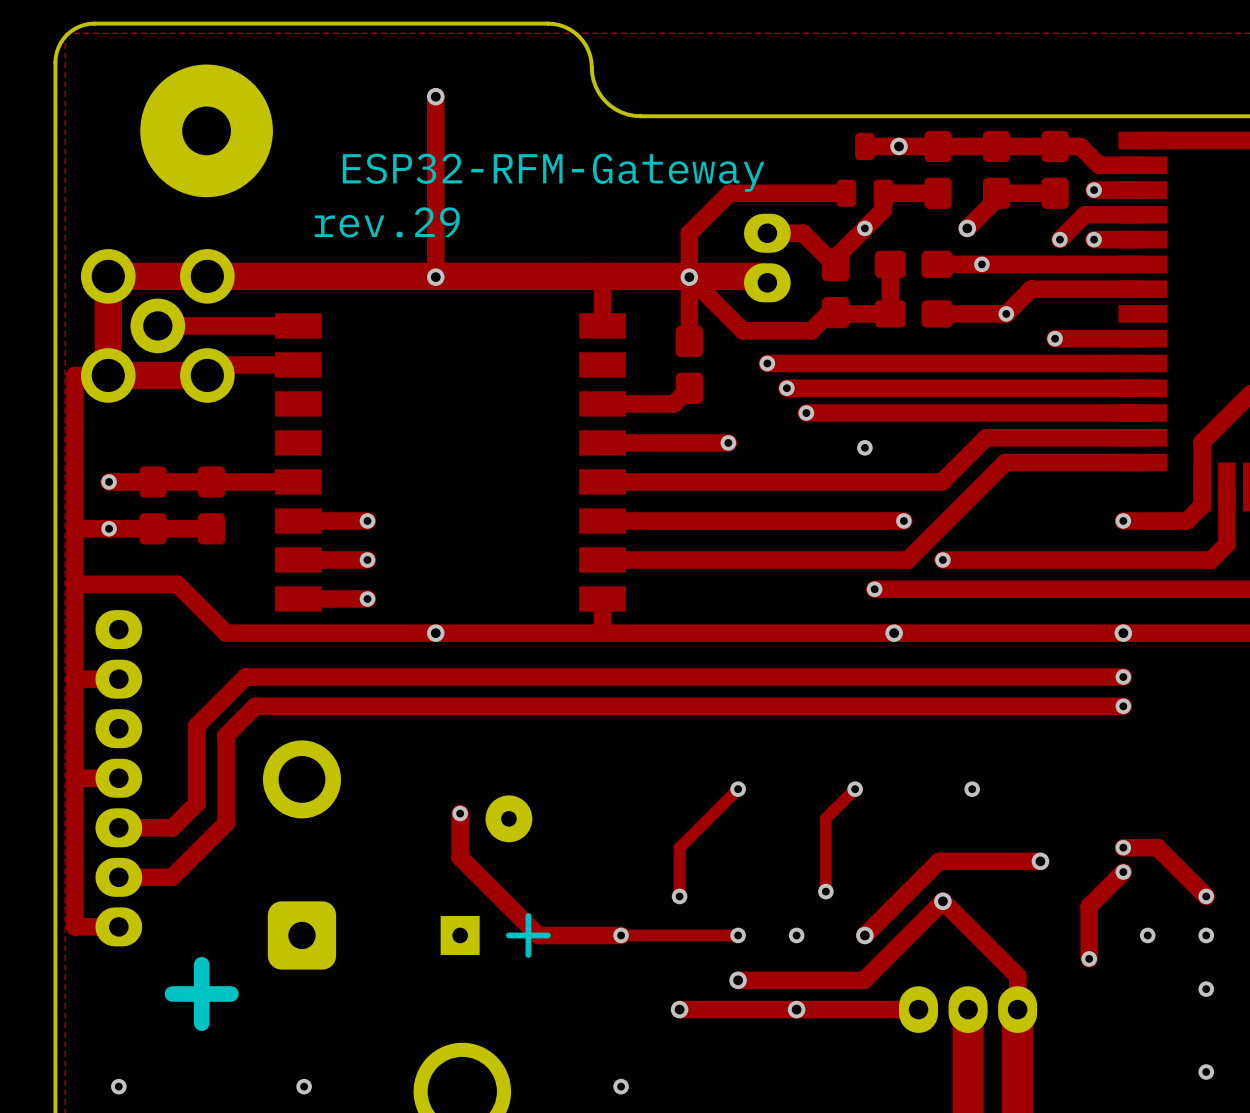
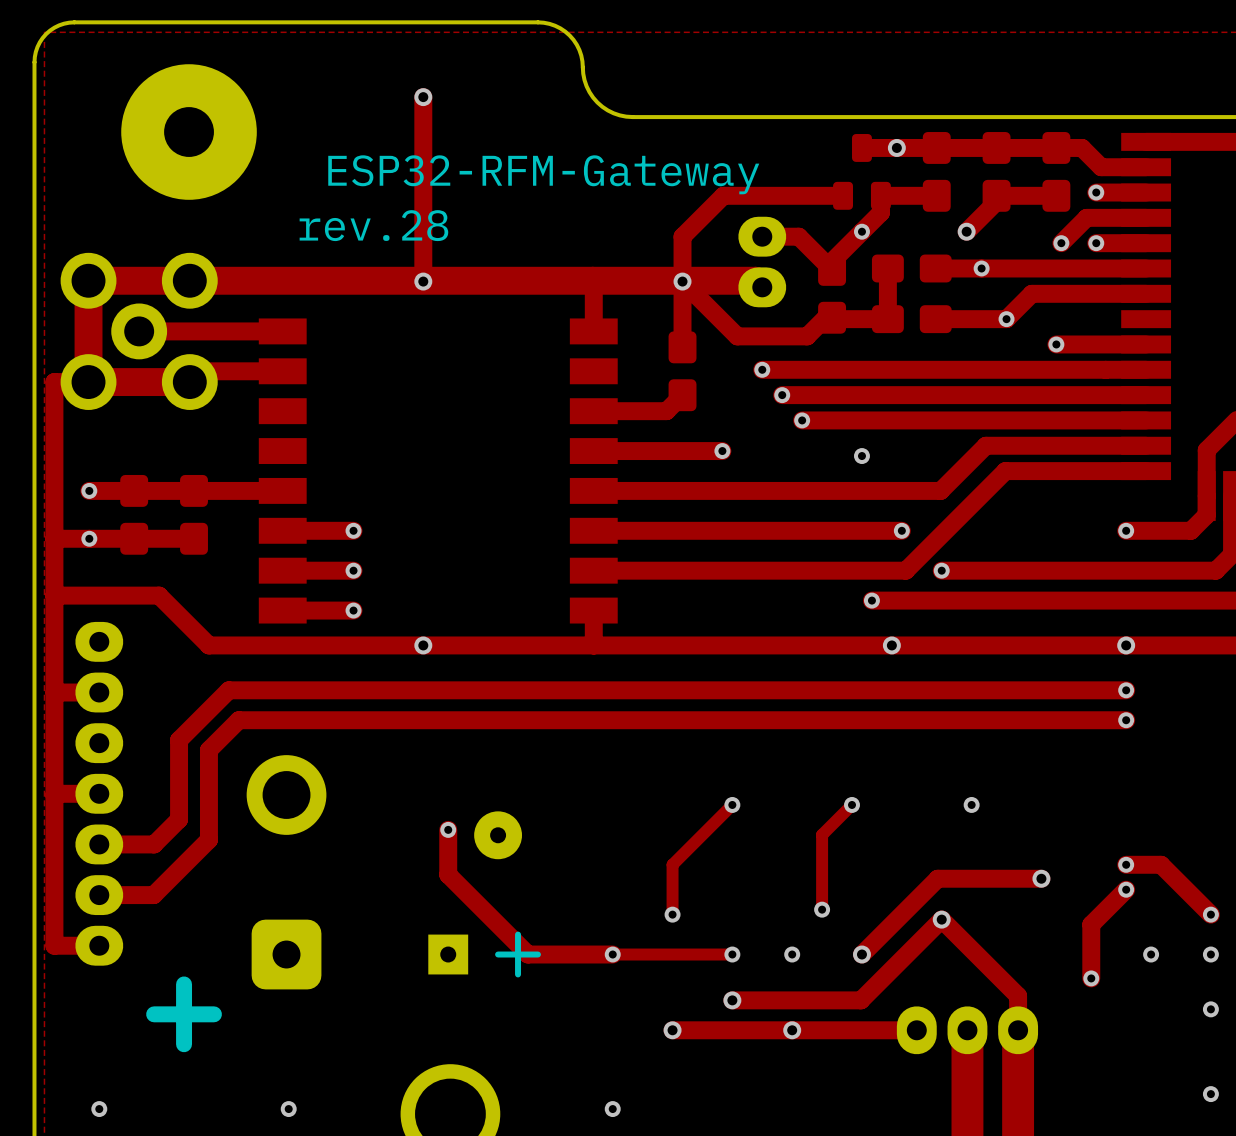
text: rev.29 (387, 222) -> rev.28 (373, 225)

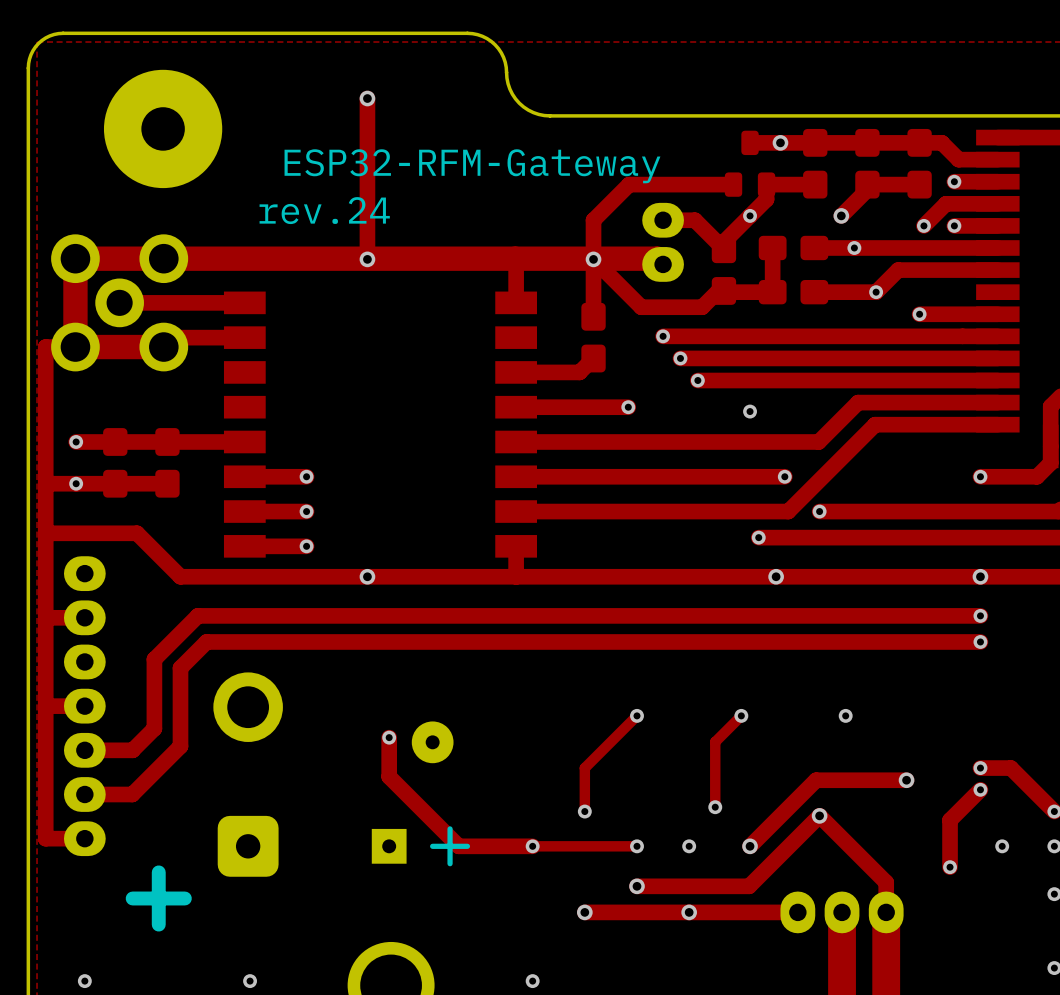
text: rev.28 (373, 225) -> rev.24 (324, 210)

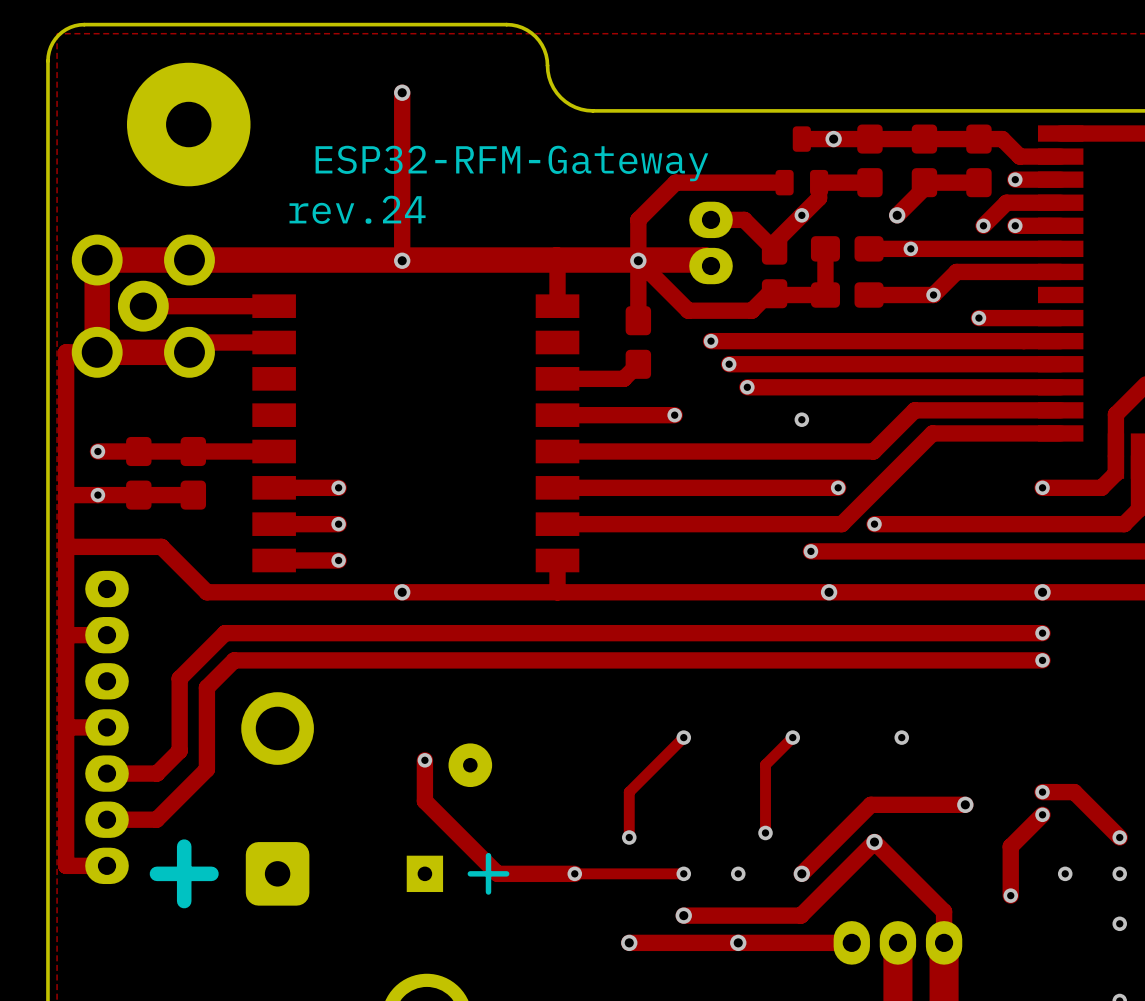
line: (158, 872) (158, 924) -> (184, 901) (184, 846)
line: (132, 898) (184, 898) -> (156, 873) (211, 873)

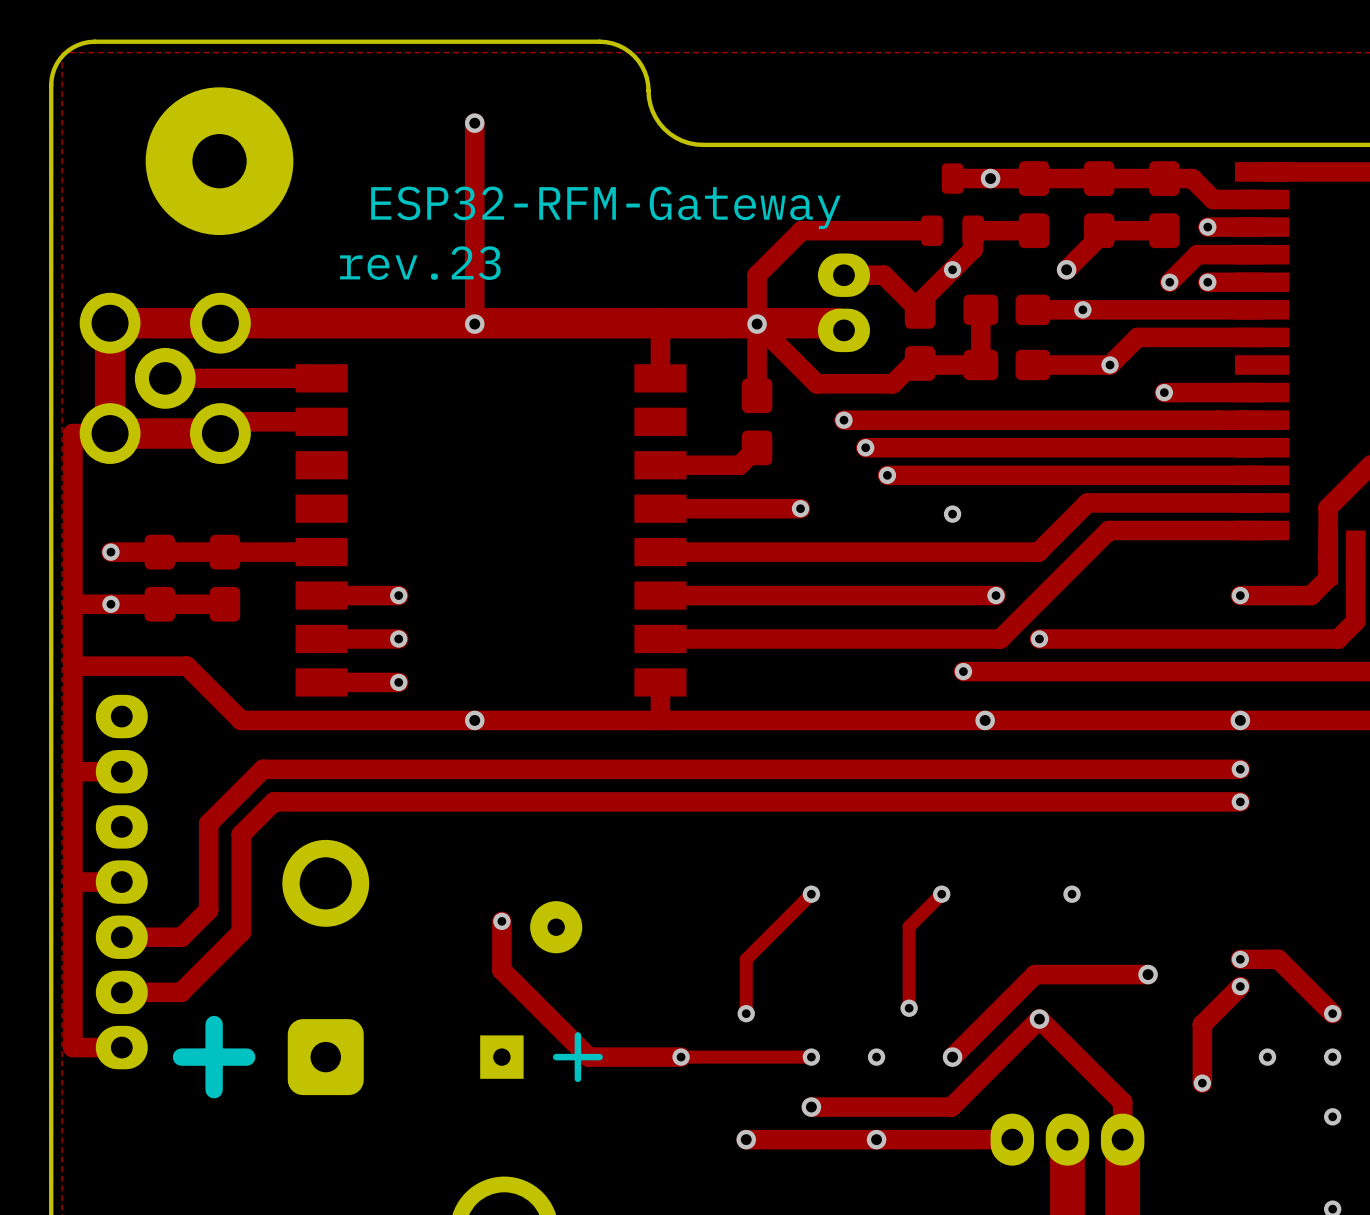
text: rev.24 (357, 209) -> rev.23 (420, 263)

